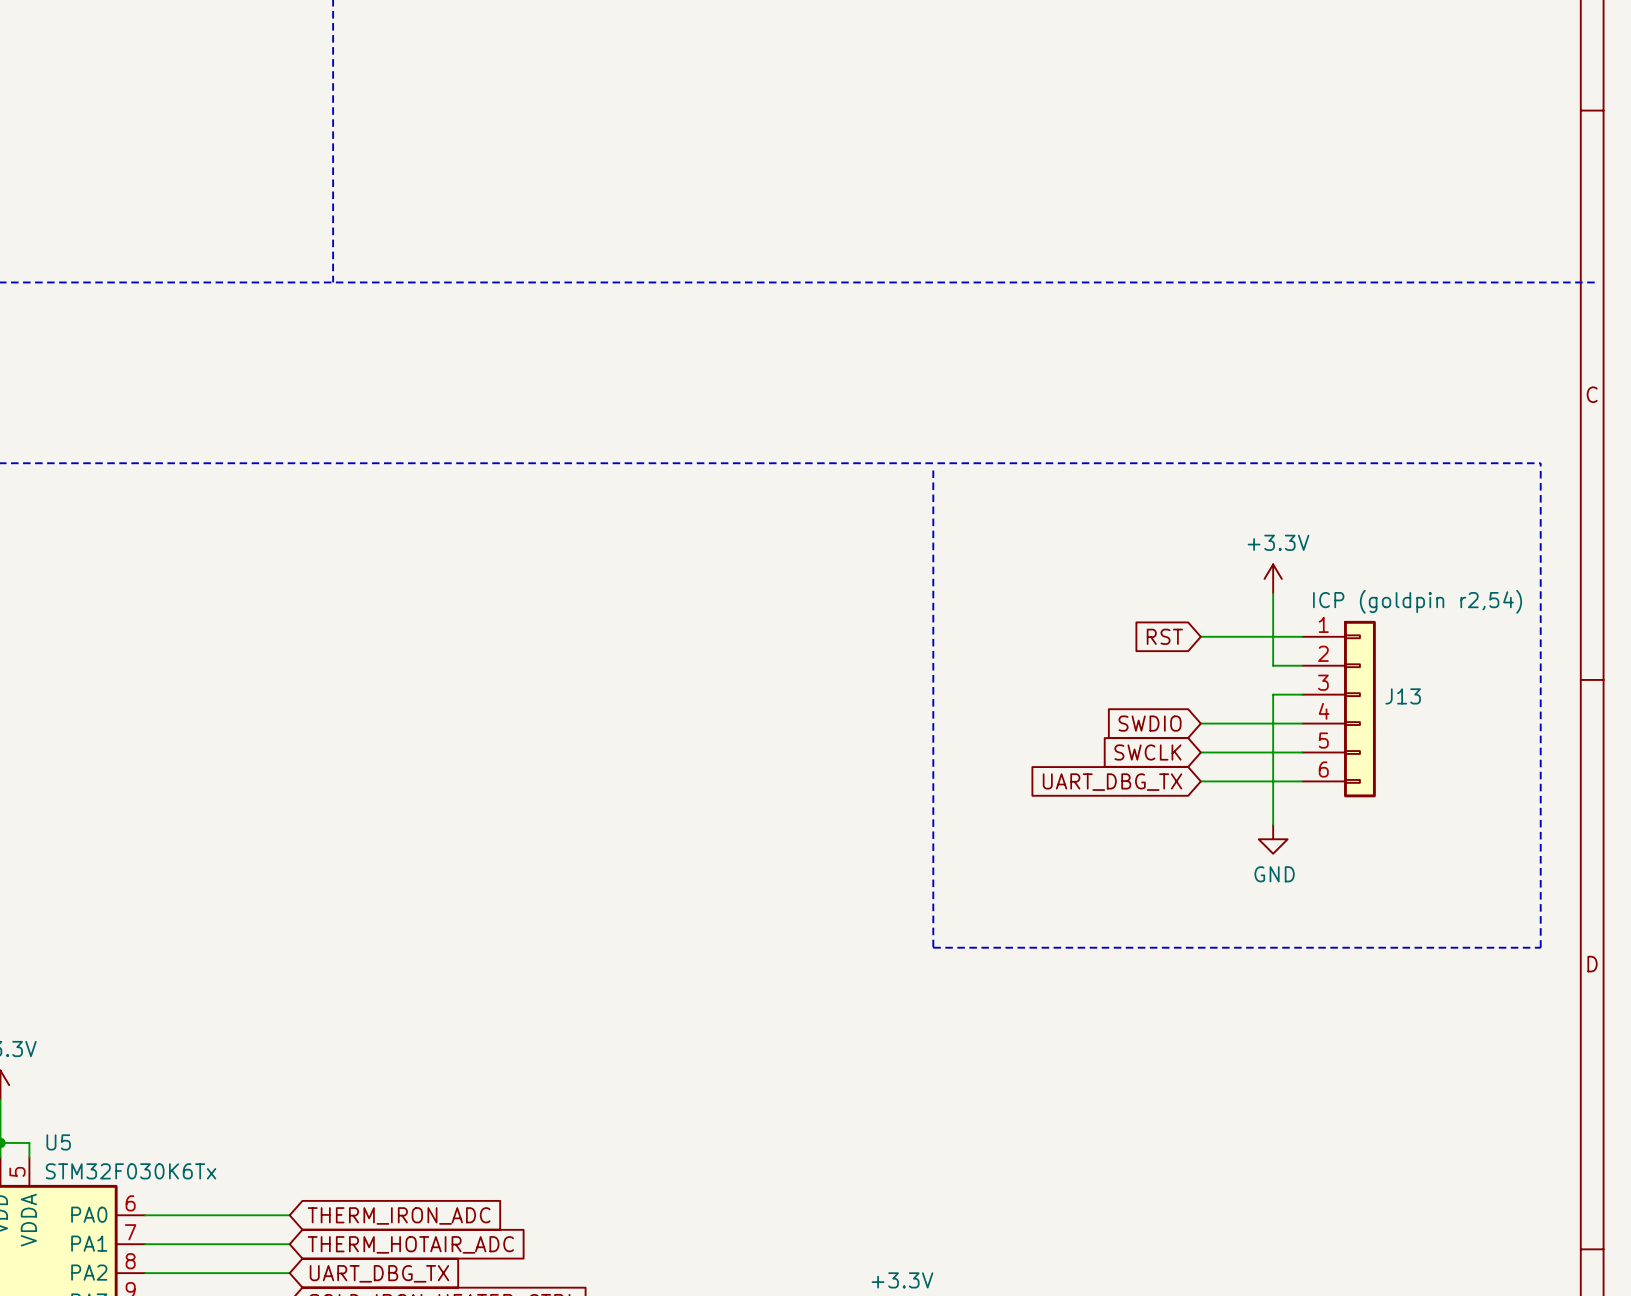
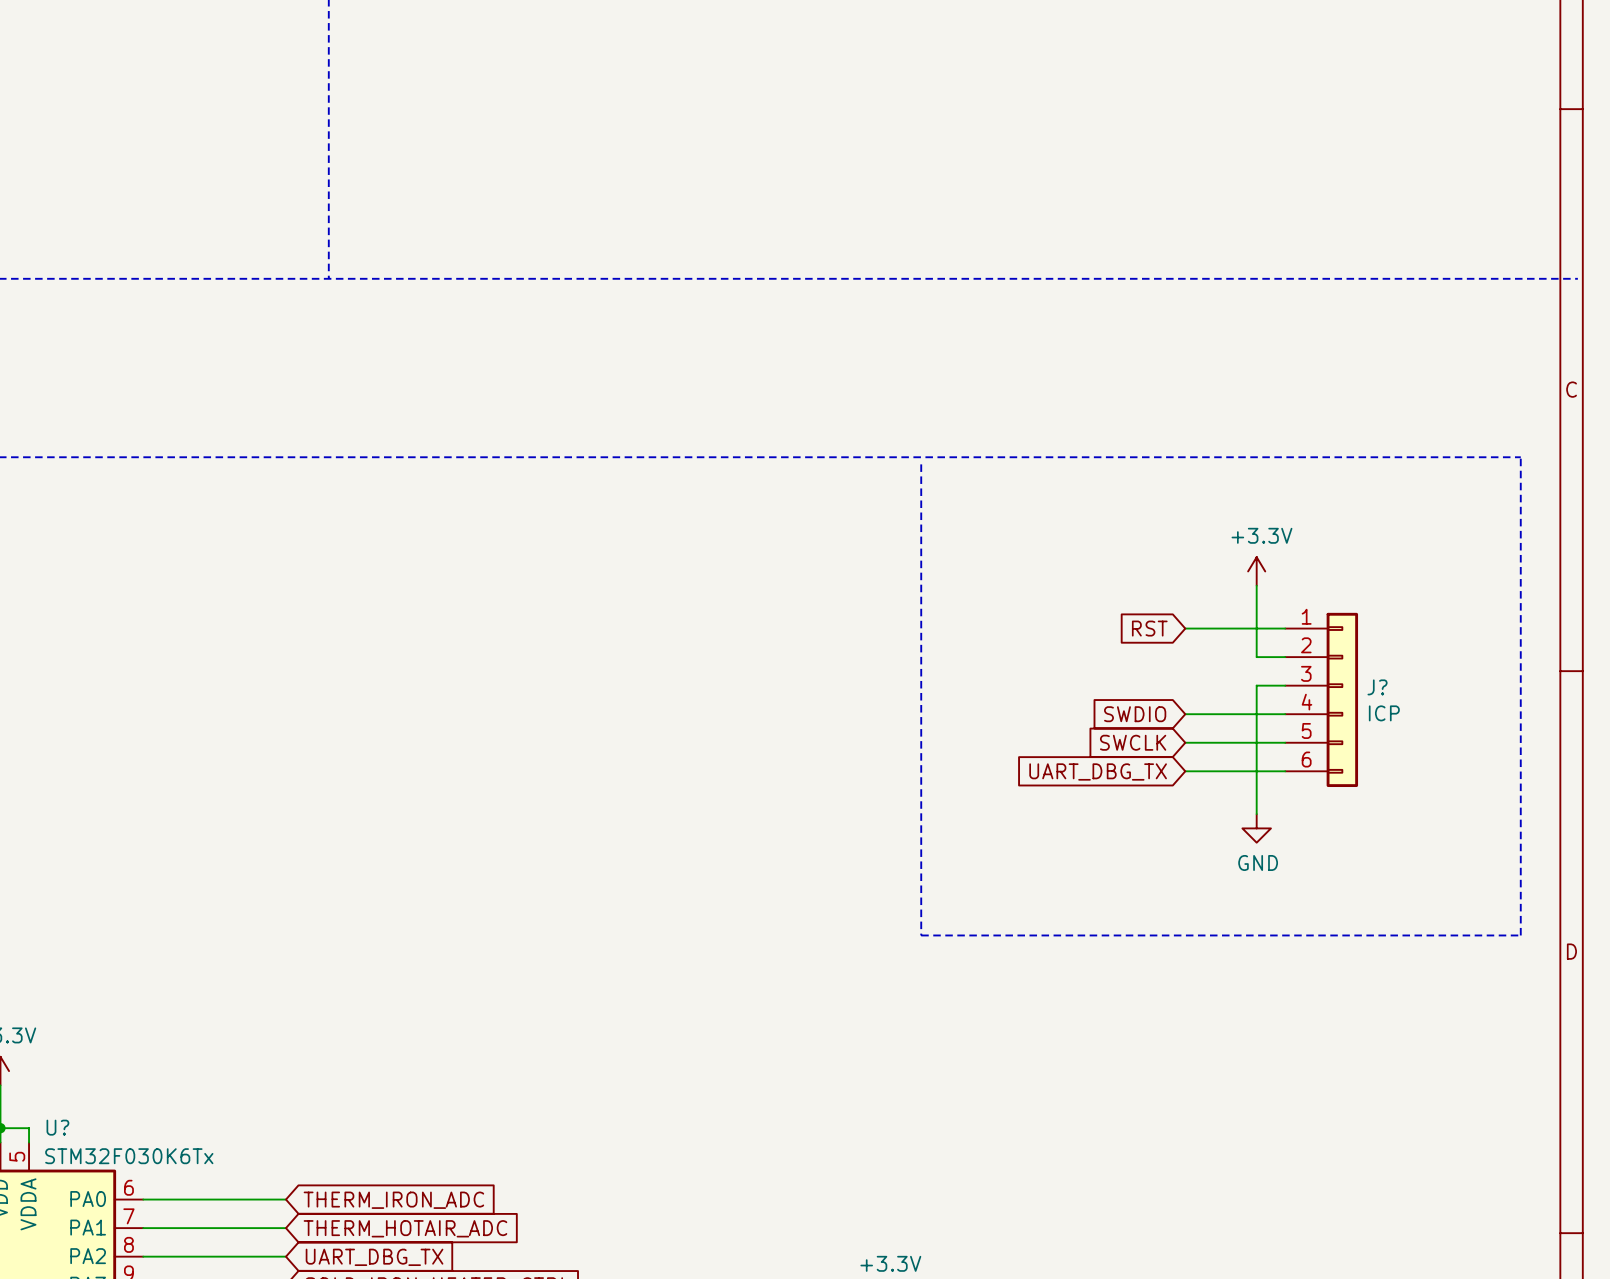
J13 value: ICP (goldpin r2,54) (1417, 601) -> ICP (1384, 713)
J13 name: J13 (1403, 696) -> J? (1377, 687)
U5 name: U5 (58, 1142) -> U? (57, 1127)

